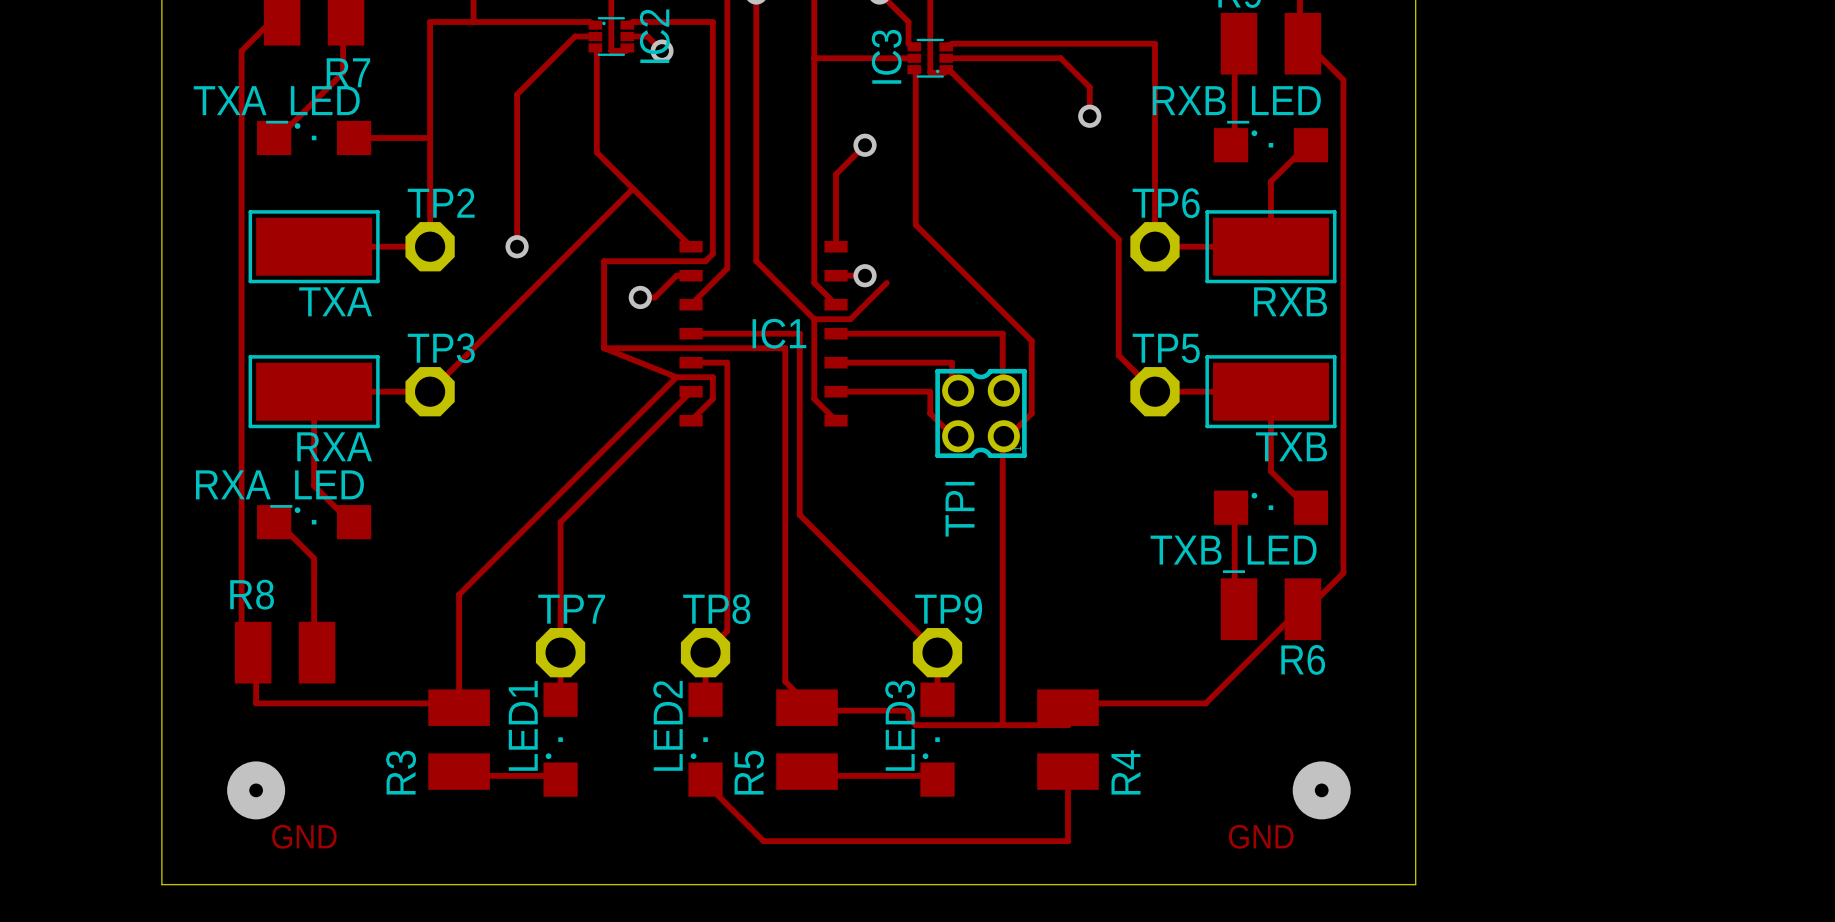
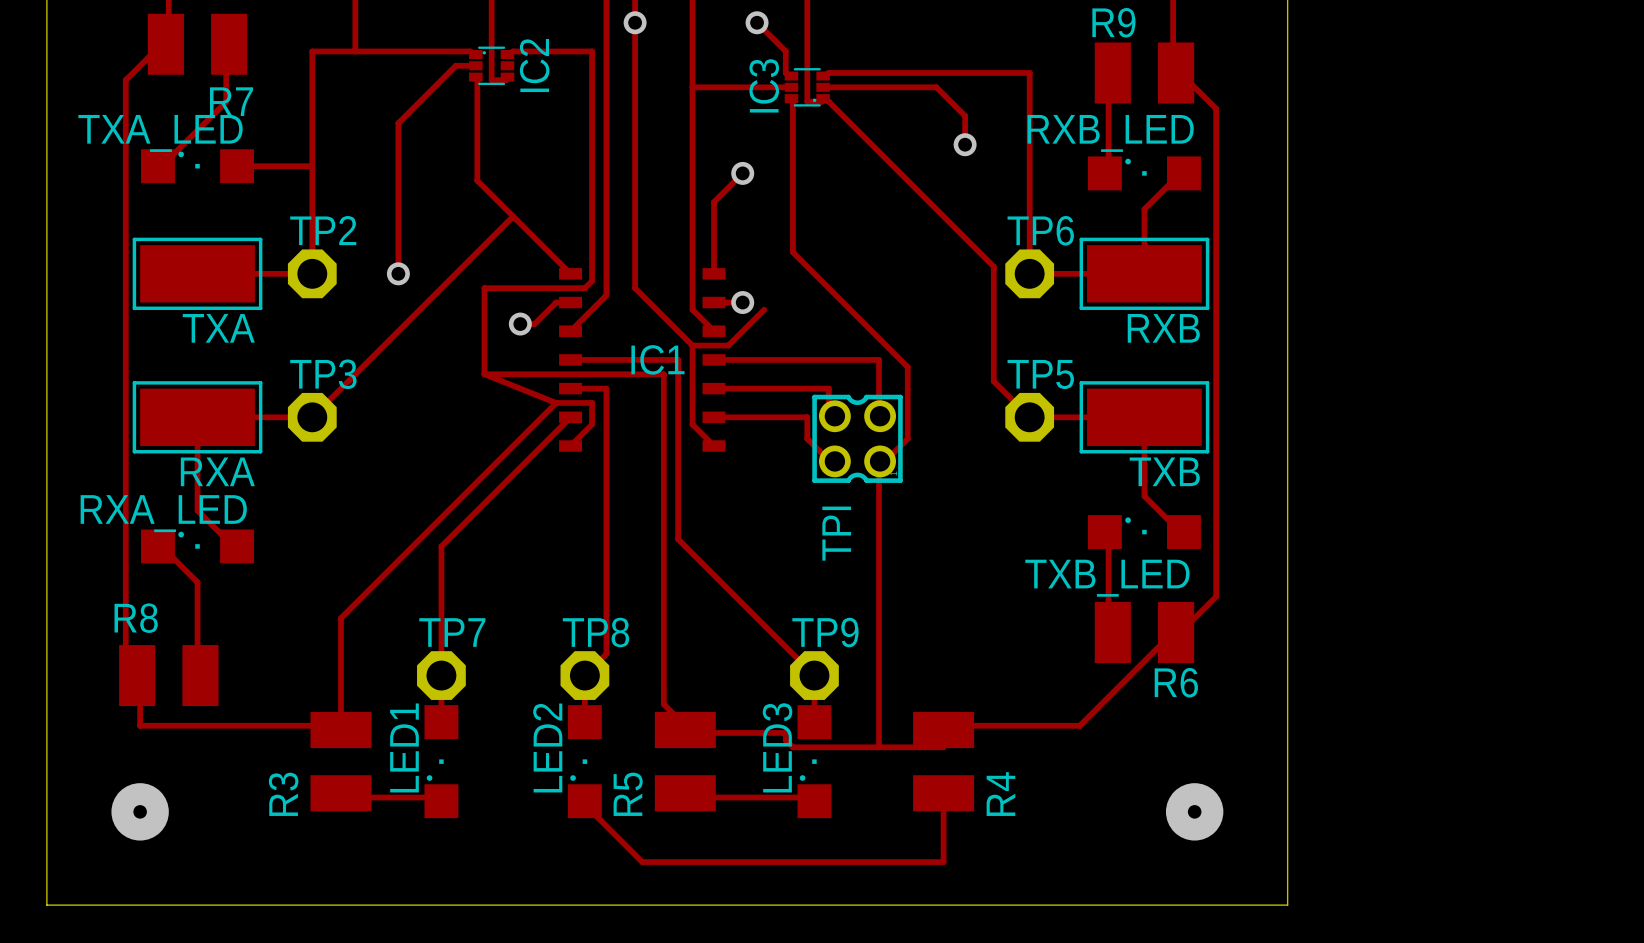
track: (627, 36) (647, 36) (662, 51) -> none
via: (662, 51) -> none
text: GND (304, 836) -> none
text: GND (1261, 836) -> none

